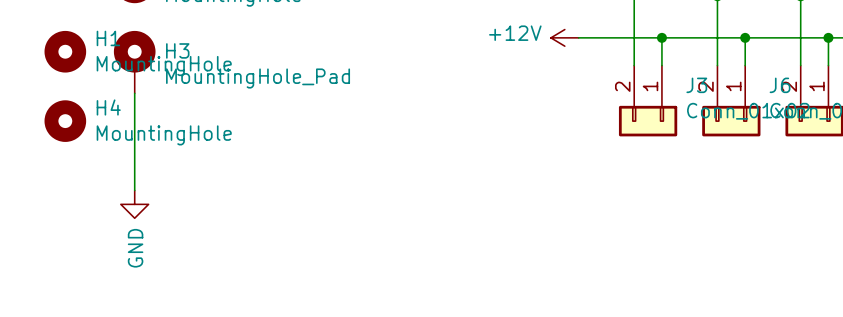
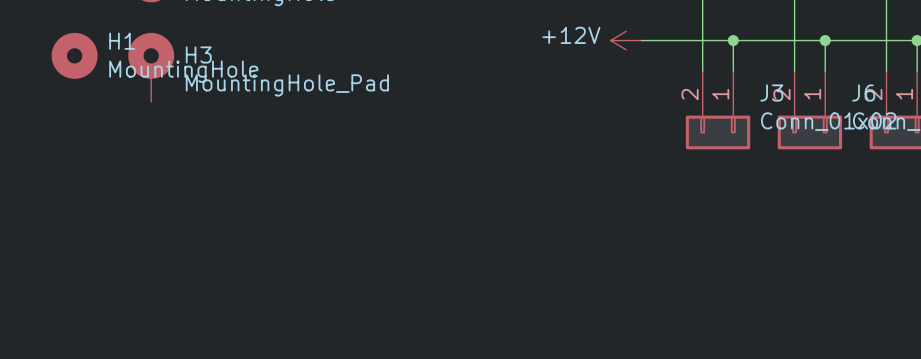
wire: (134, 93) (134, 190) -> none
H4: MountingHole (65, 121) -> none
power symbol: GND (134, 204) -> none

